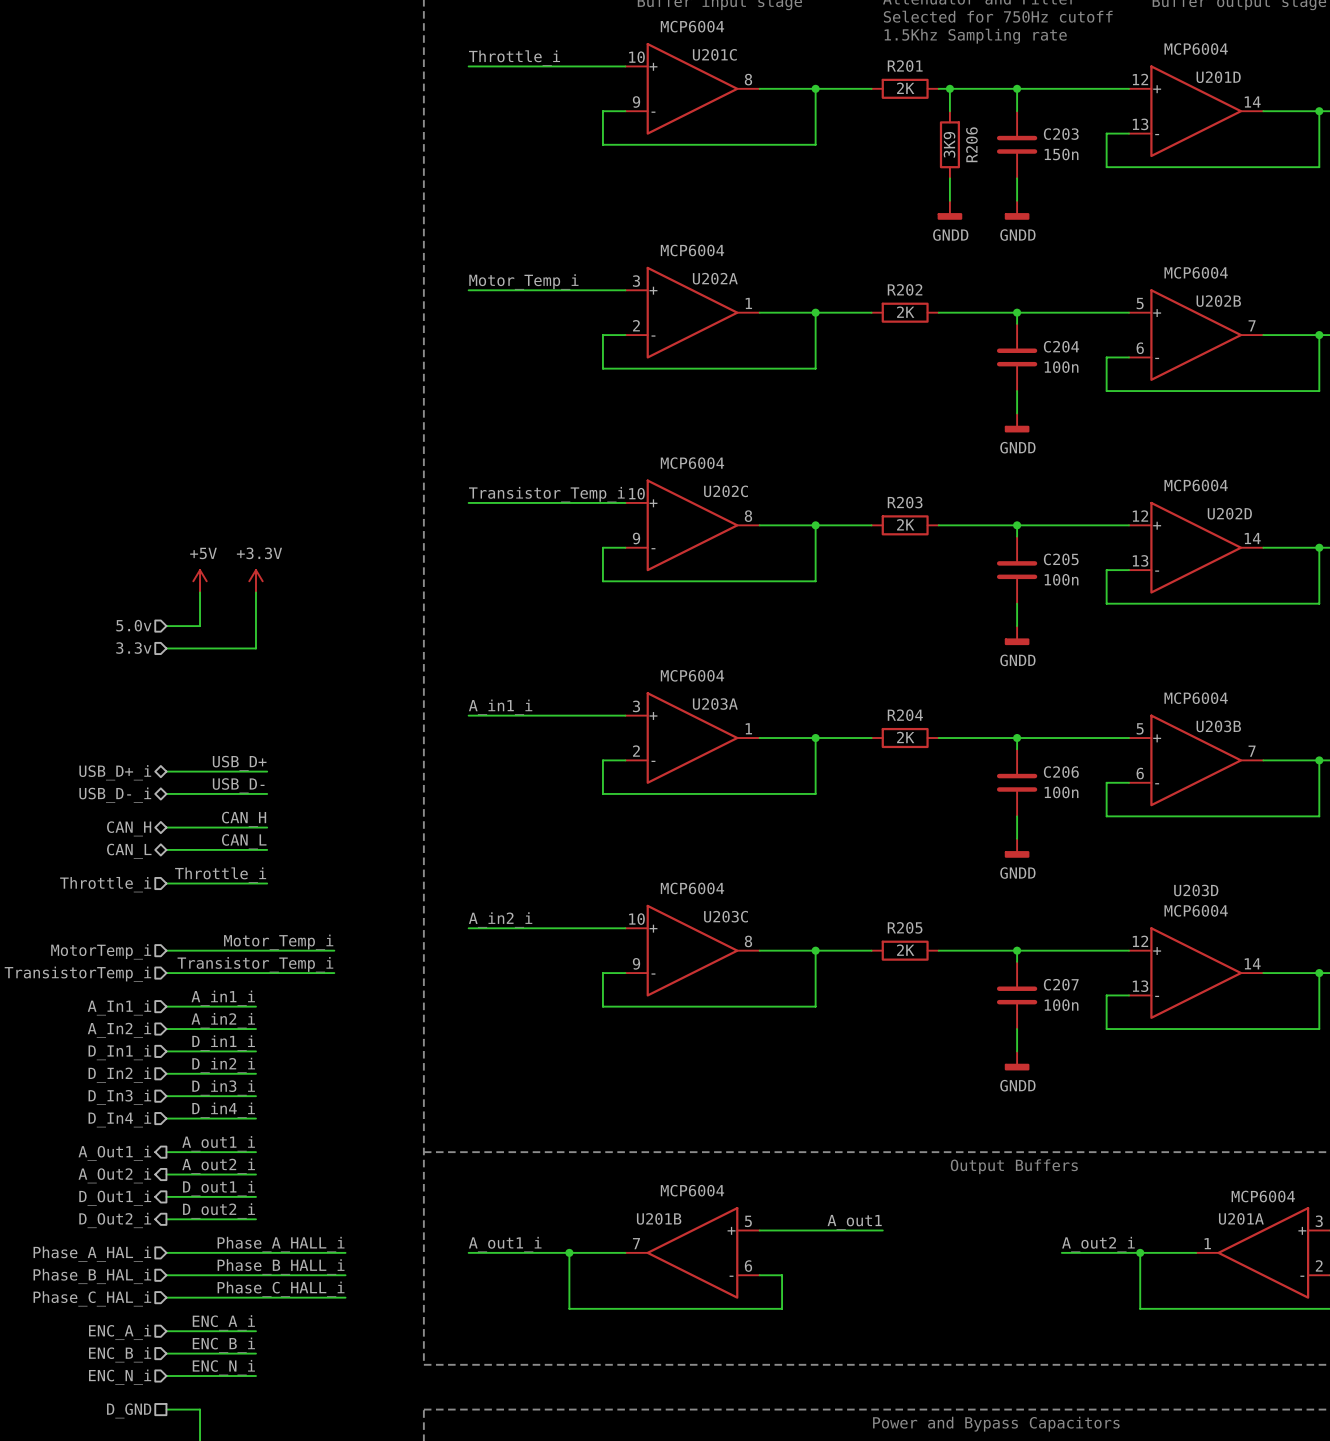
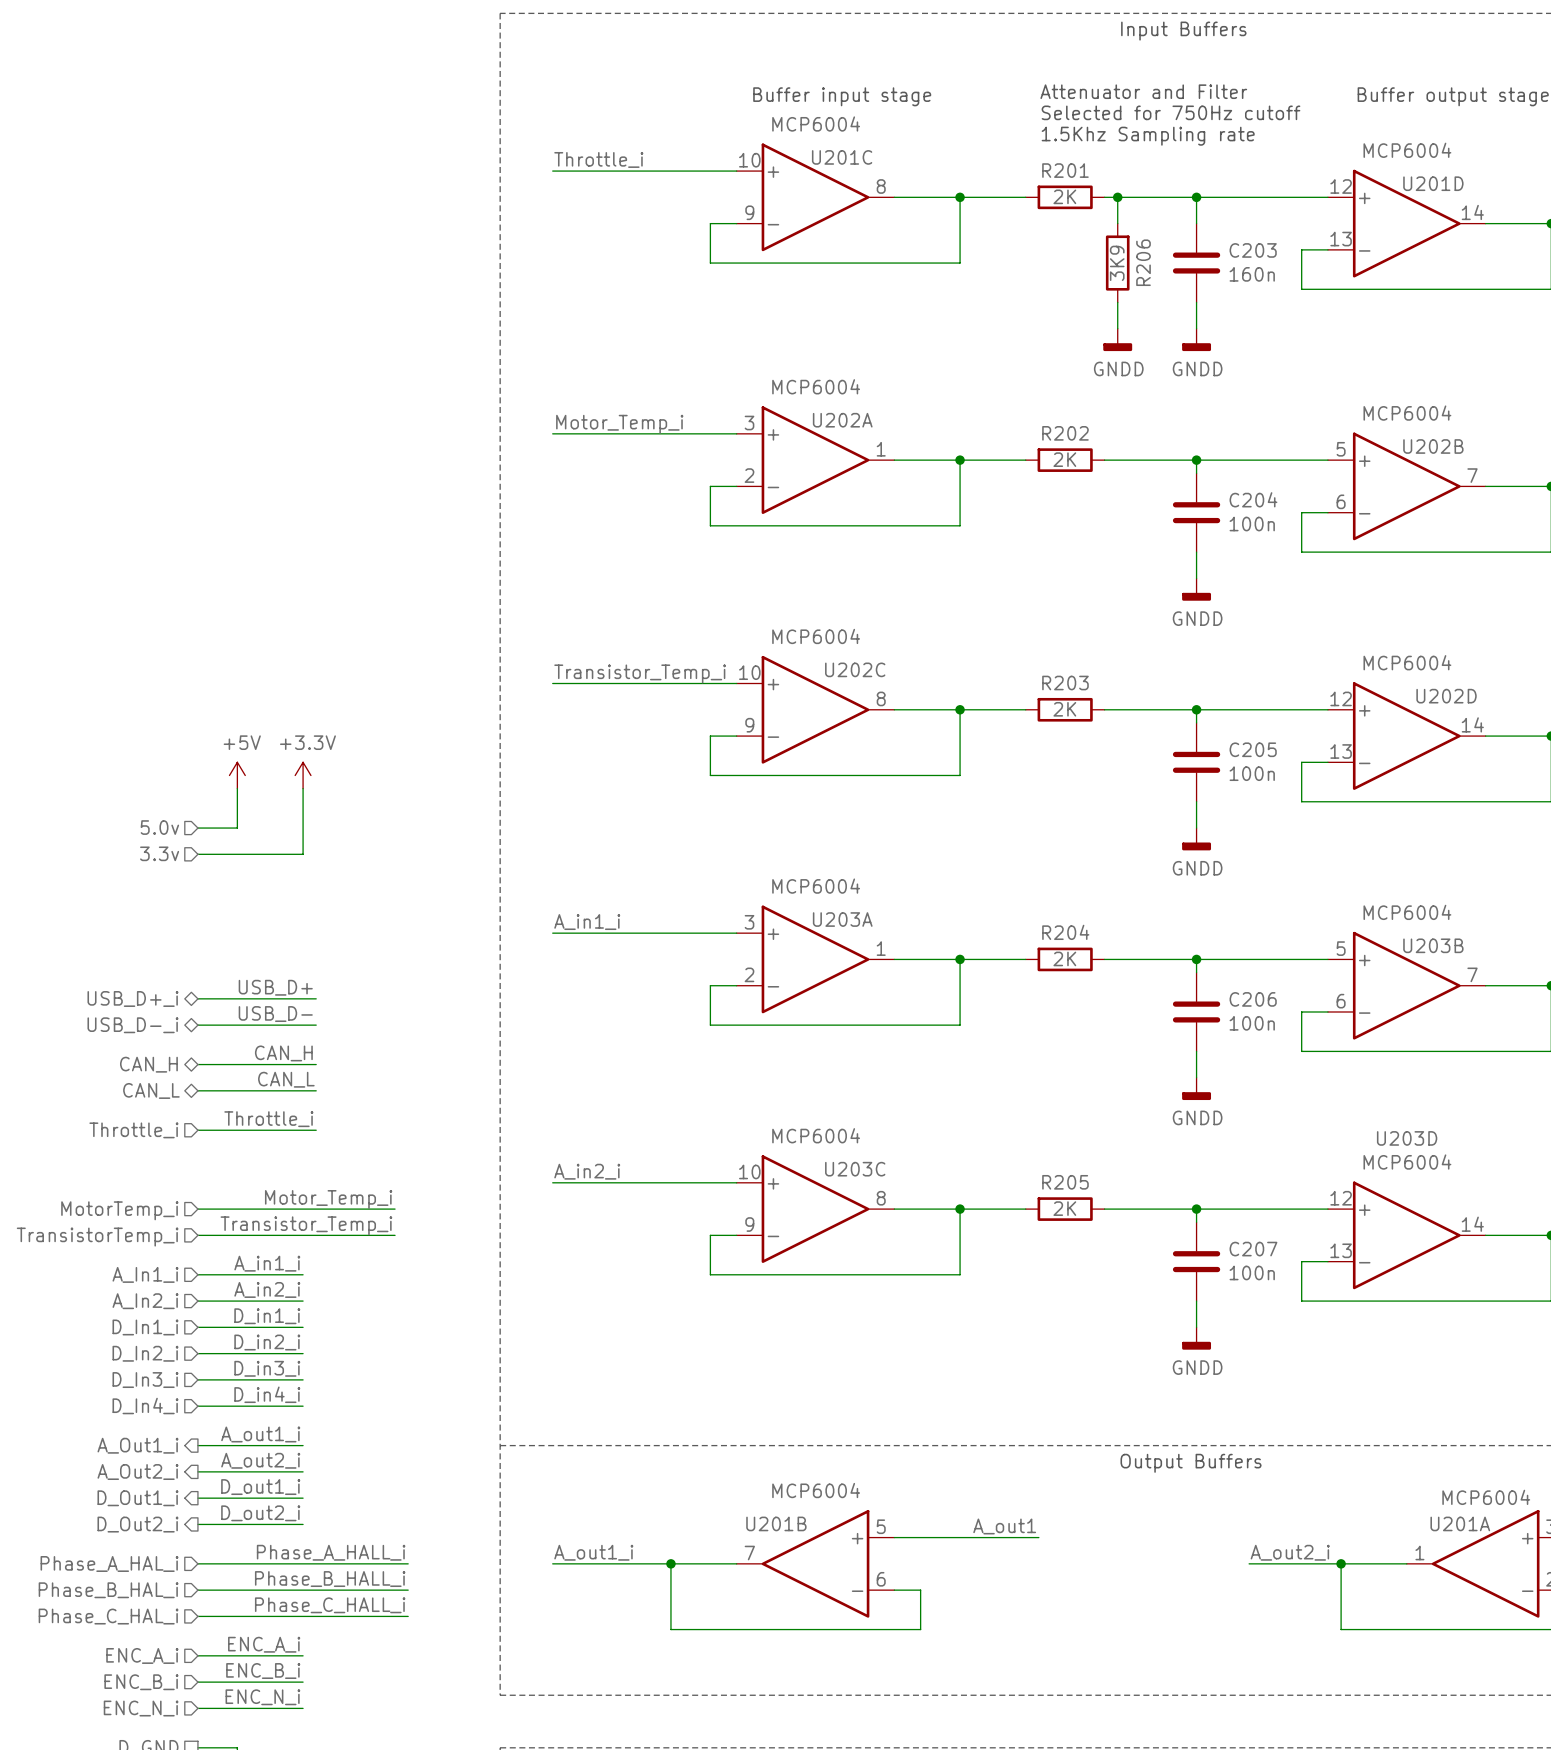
C203 value: 150n (1061, 154) -> 160n (1252, 274)

